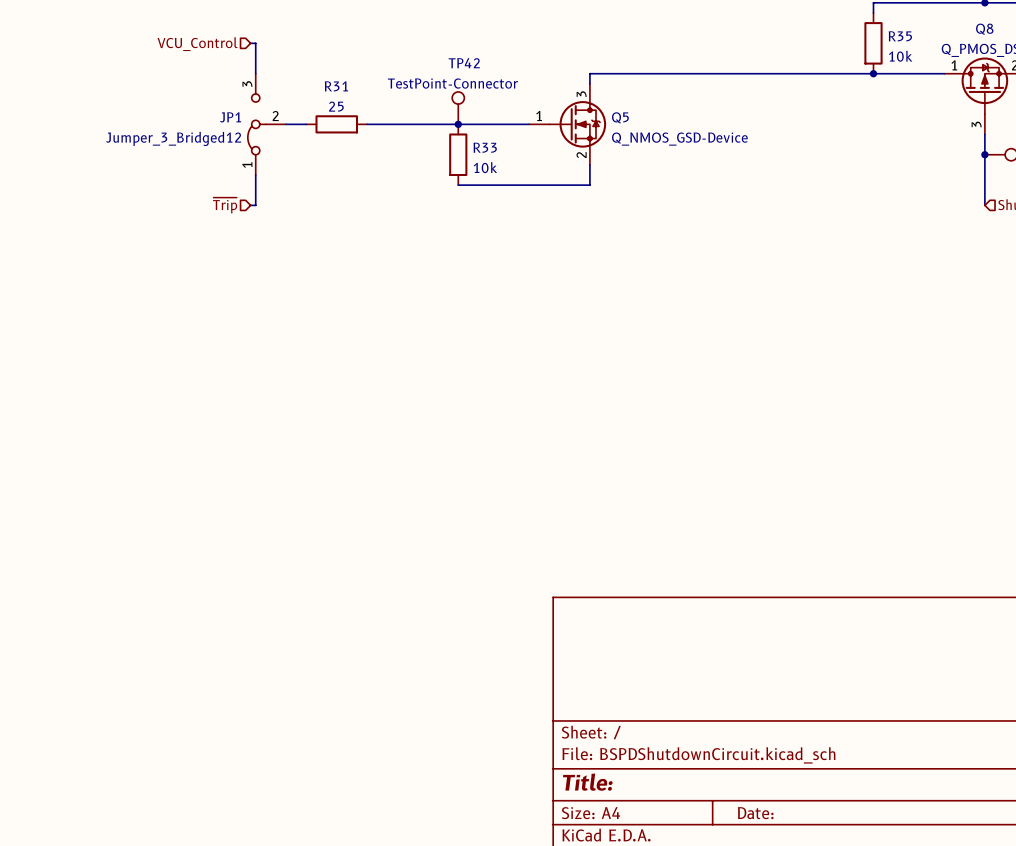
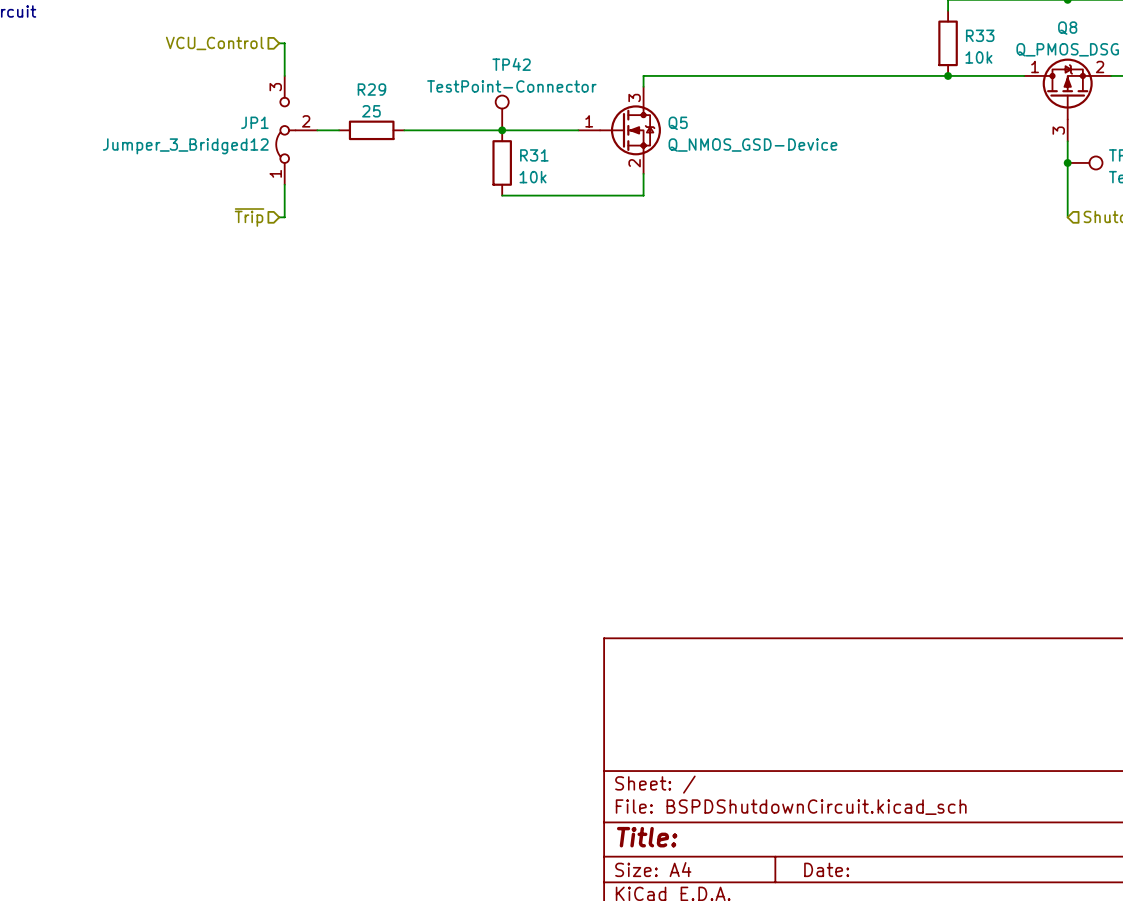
R35 name: R35 (900, 36) -> R33 (980, 35)
R31 name: R31 (336, 86) -> R29 (371, 89)
R33 name: R33 (485, 147) -> R31 (534, 155)

